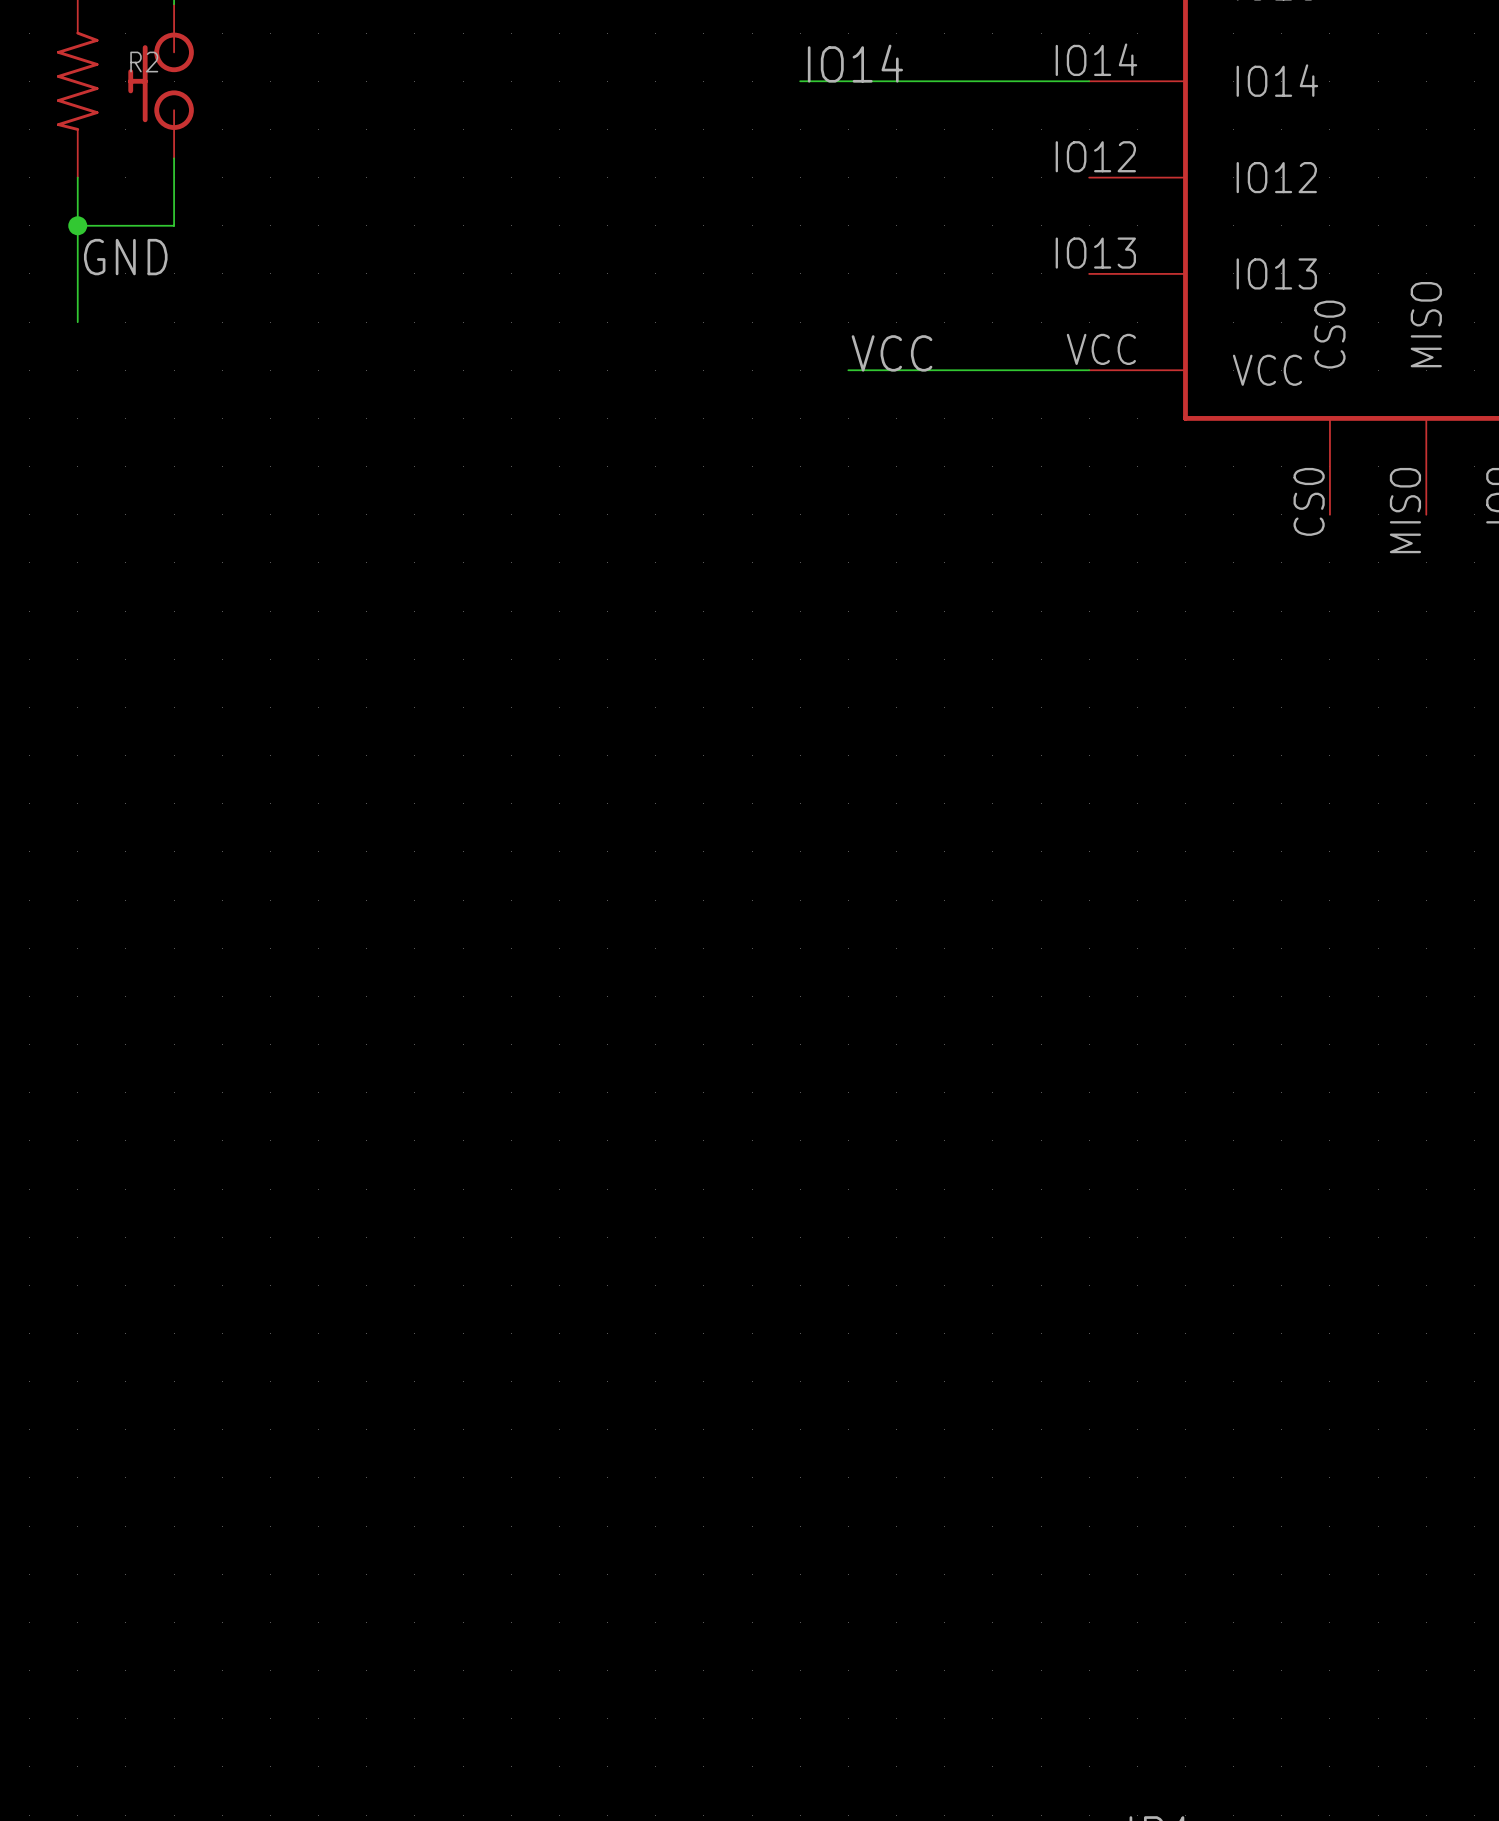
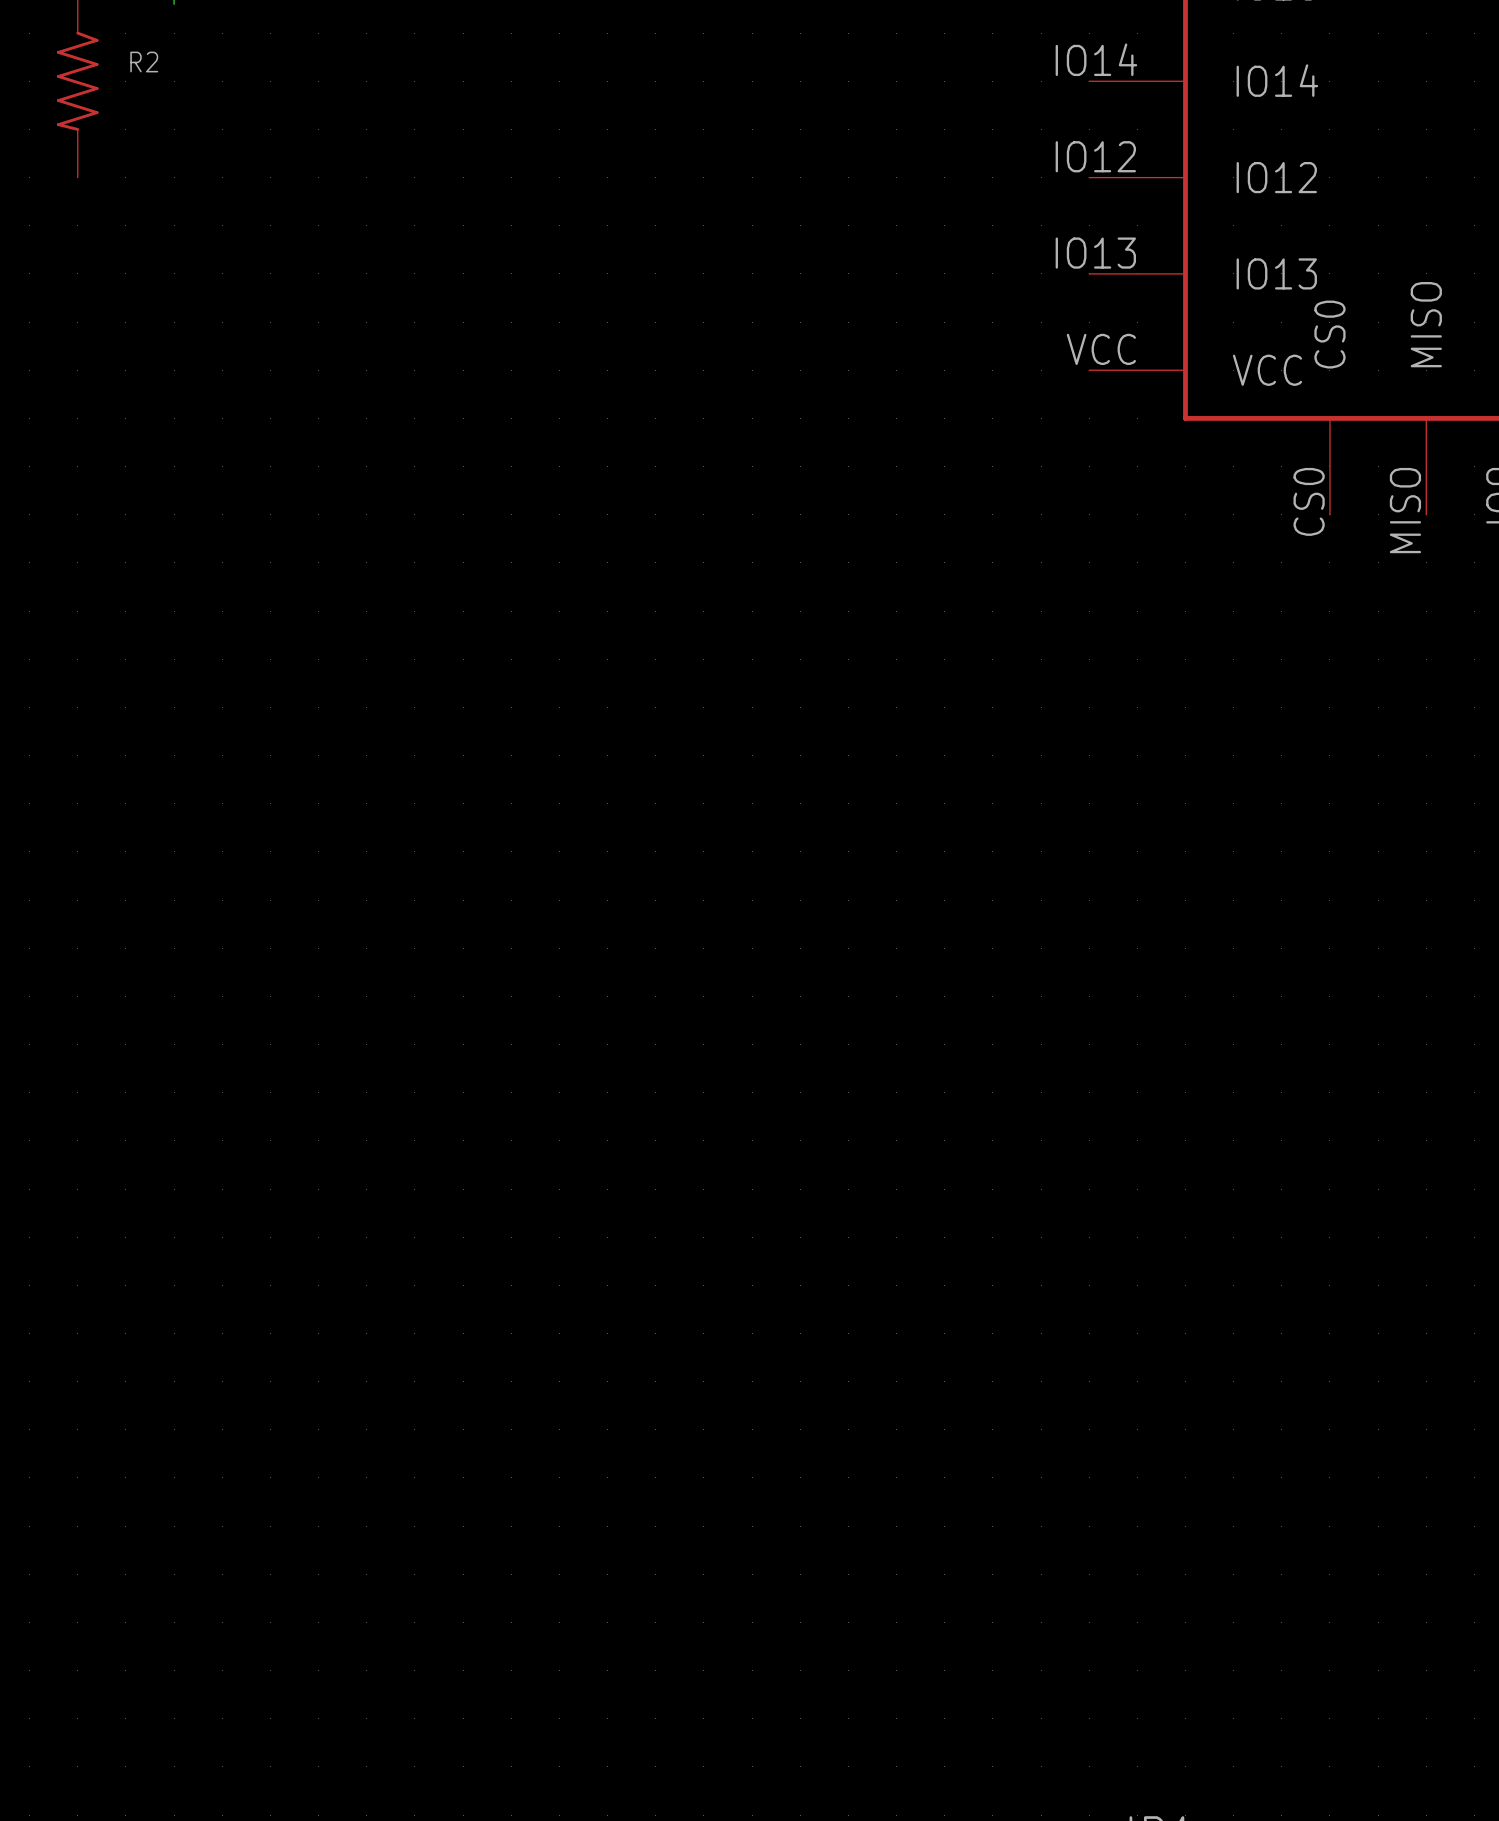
label: IO14 (855, 63) -> none
part: (161, 81) -> none
wire: (800, 81) (1089, 81) -> none
wire: (174, 158) (174, 225) (77, 225) -> none
wire: (77, 177) (77, 322) -> none
junction: (77, 225) -> none
label: GND (125, 257) -> none
label: VCC (892, 353) -> none
wire: (848, 370) (1089, 370) -> none

